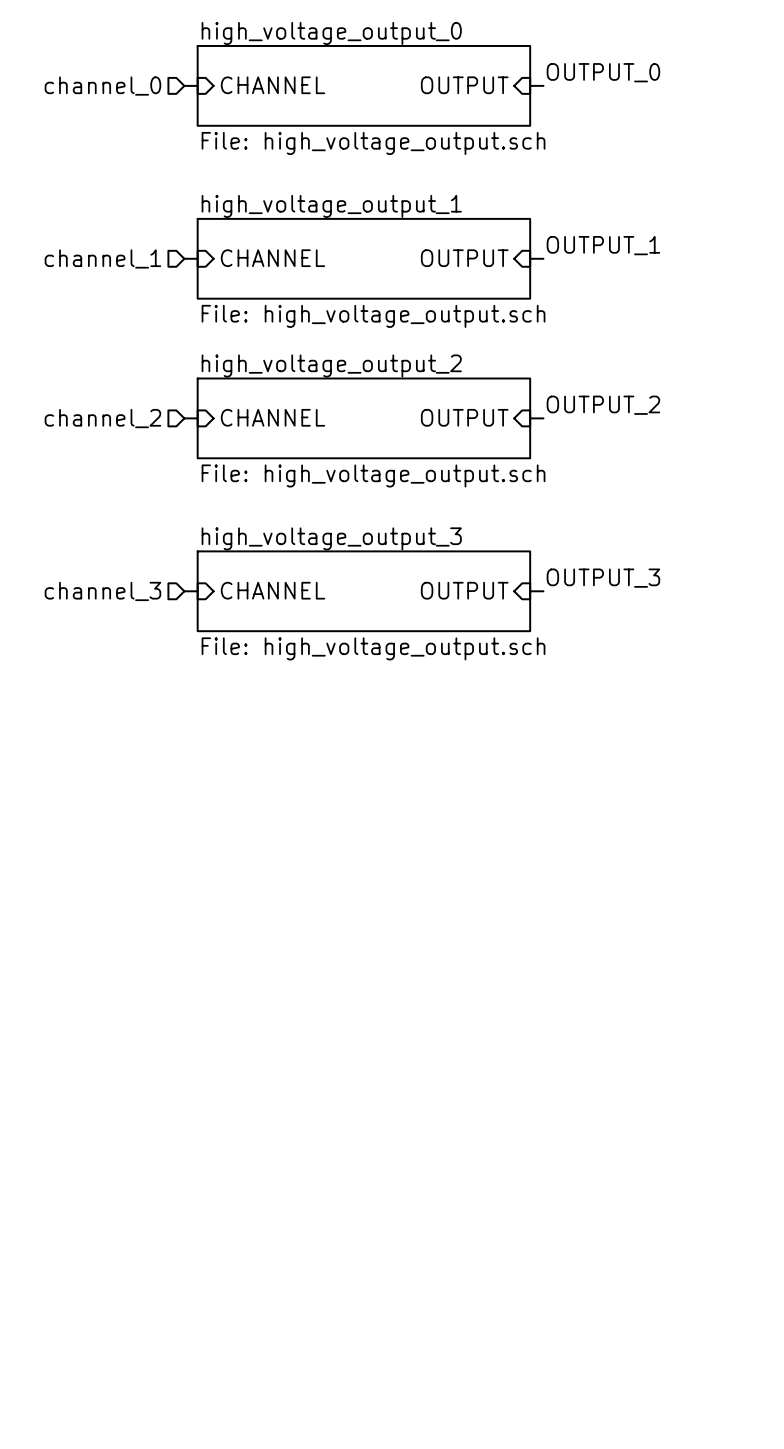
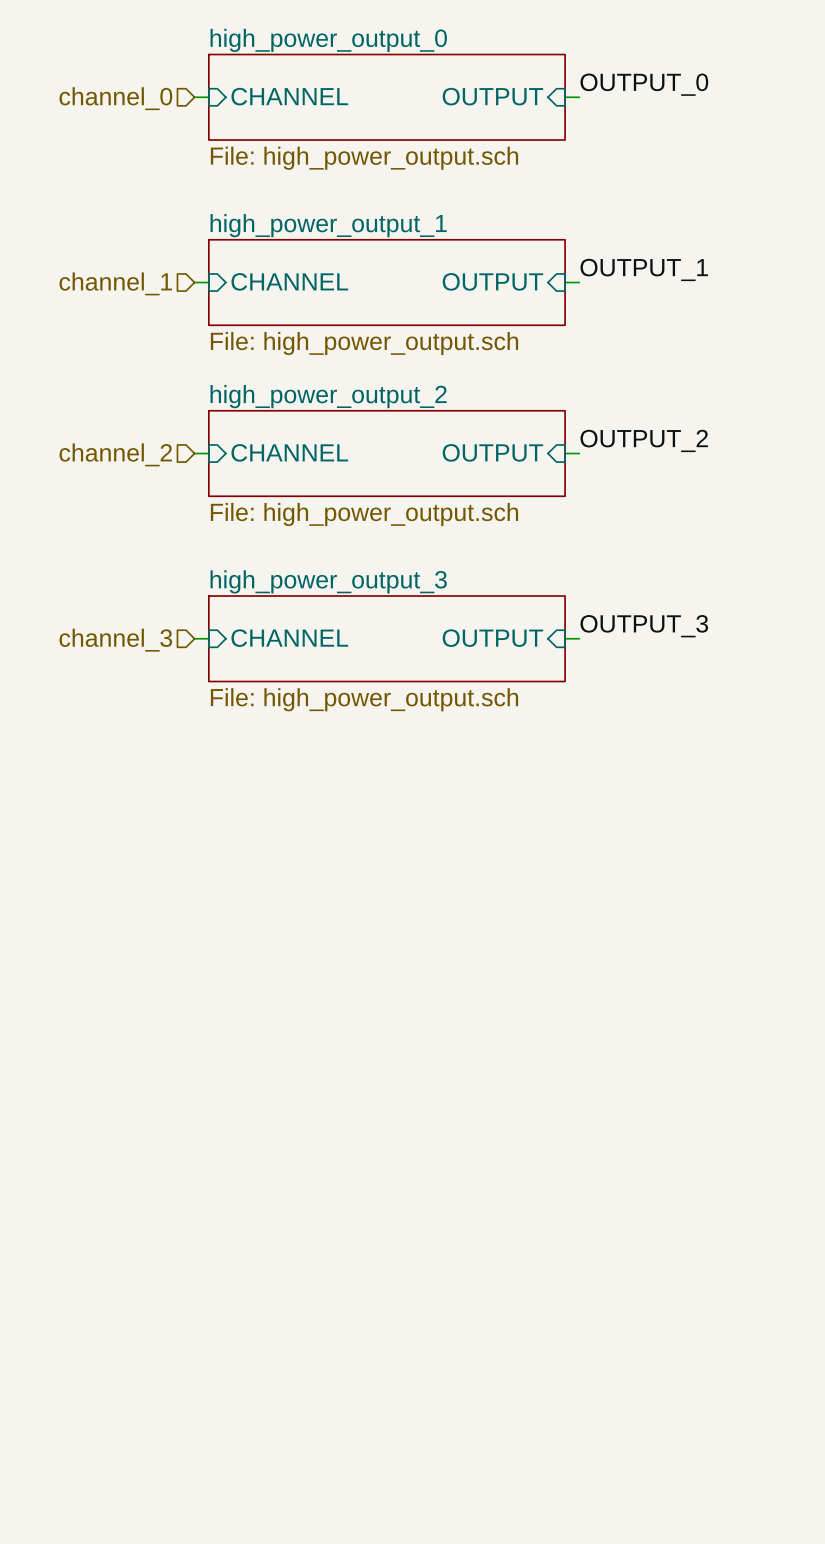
sheet high_voltage_output_0 name: high_voltage_output_0 (331, 33) -> high_power_output_0 (328, 40)
sheet high_voltage_output_0 value: File: high_voltage_output.sch (373, 143) -> File: high_power_output.sch (364, 158)
sheet high_voltage_output_1 name: high_voltage_output_1 (331, 206) -> high_power_output_1 (328, 225)
sheet high_voltage_output_1 value: File: high_voltage_output.sch (373, 316) -> File: high_power_output.sch (364, 343)
sheet high_voltage_output_2 name: high_voltage_output_2 (331, 365) -> high_power_output_2 (328, 396)
sheet high_voltage_output_2 value: File: high_voltage_output.sch (373, 475) -> File: high_power_output.sch (364, 514)
sheet high_voltage_output_3 name: high_voltage_output_3 (331, 538) -> high_power_output_3 (328, 581)
sheet high_voltage_output_3 value: File: high_voltage_output.sch (373, 648) -> File: high_power_output.sch (364, 699)

